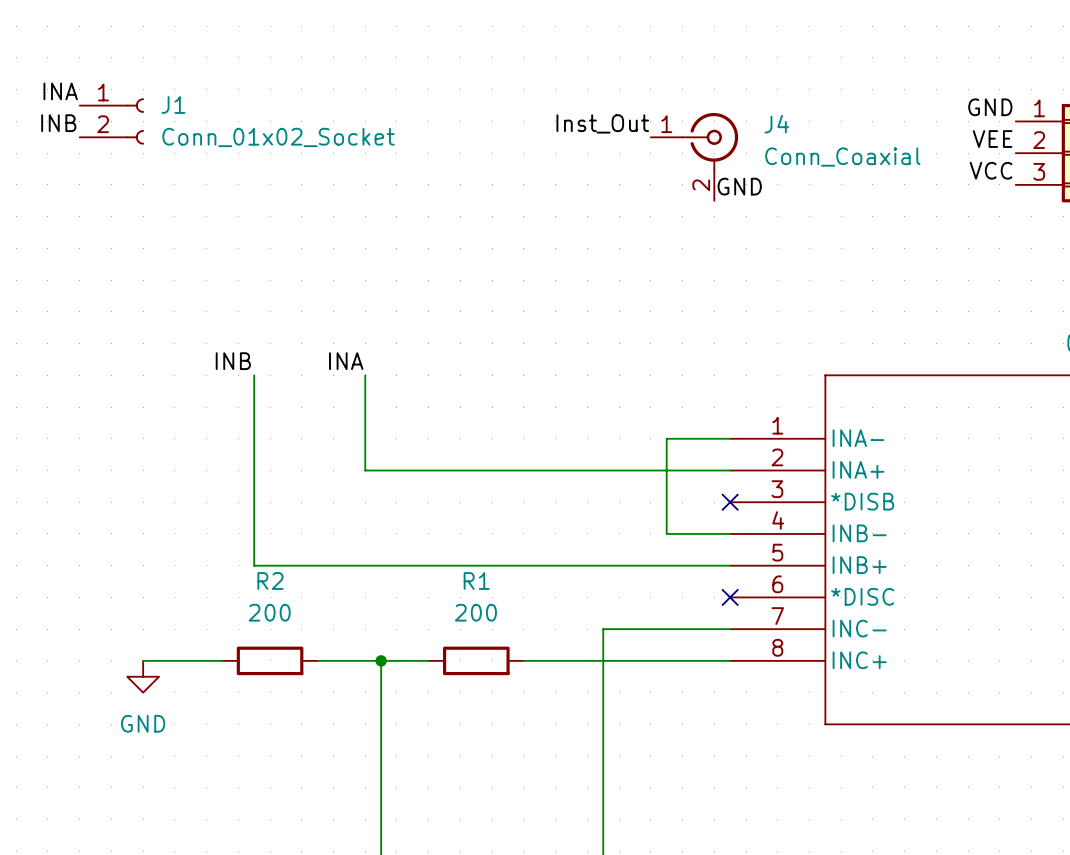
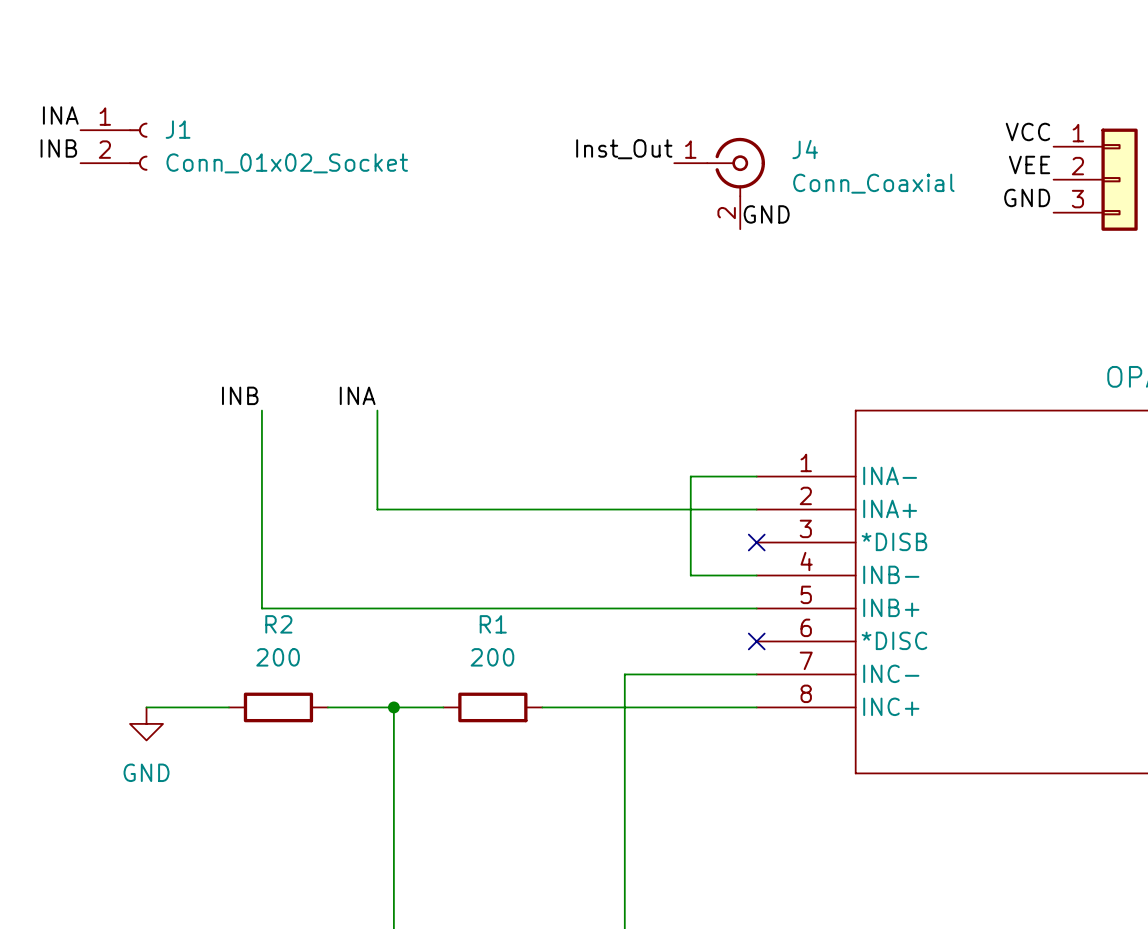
label: GND (990, 107) -> VCC (1027, 131)
label: VCC (991, 170) -> GND (1027, 197)

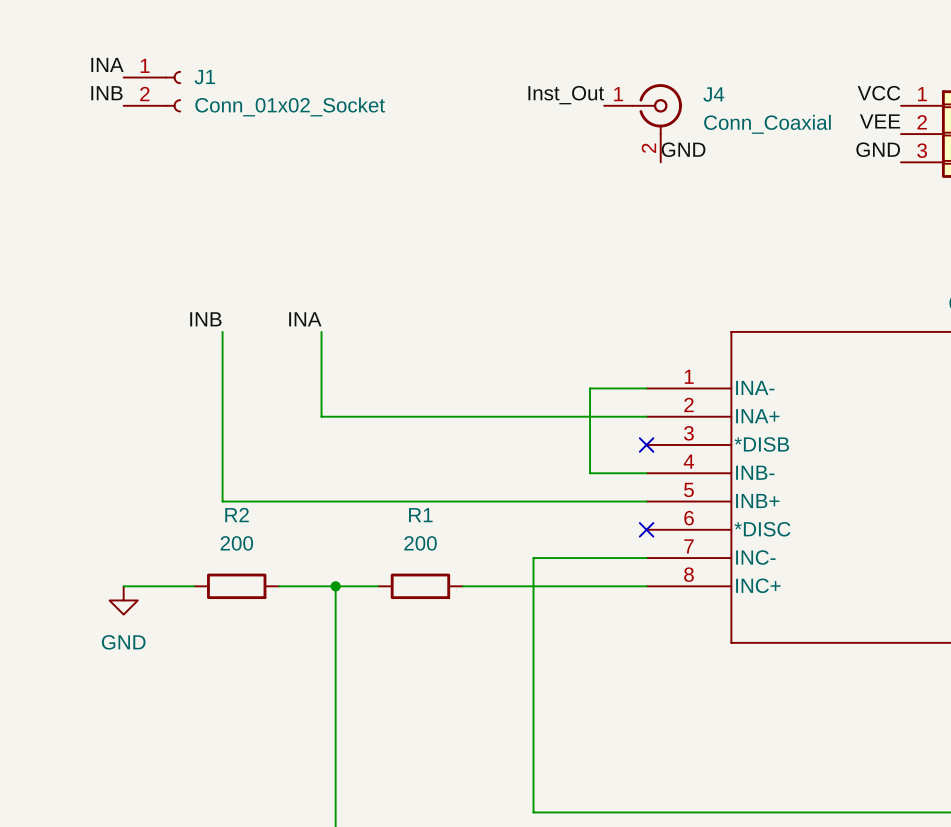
label position: INA (60, 115) -> INA (107, 64)
J1 position: (114, 146) -> (152, 91)
label position: INB (58, 148) -> INB (106, 93)
label position: Inst_Out (624, 149) -> Inst_Out (566, 95)
J4 position: (719, 183) -> (643, 123)
label position: GND (766, 214) -> GND (683, 149)

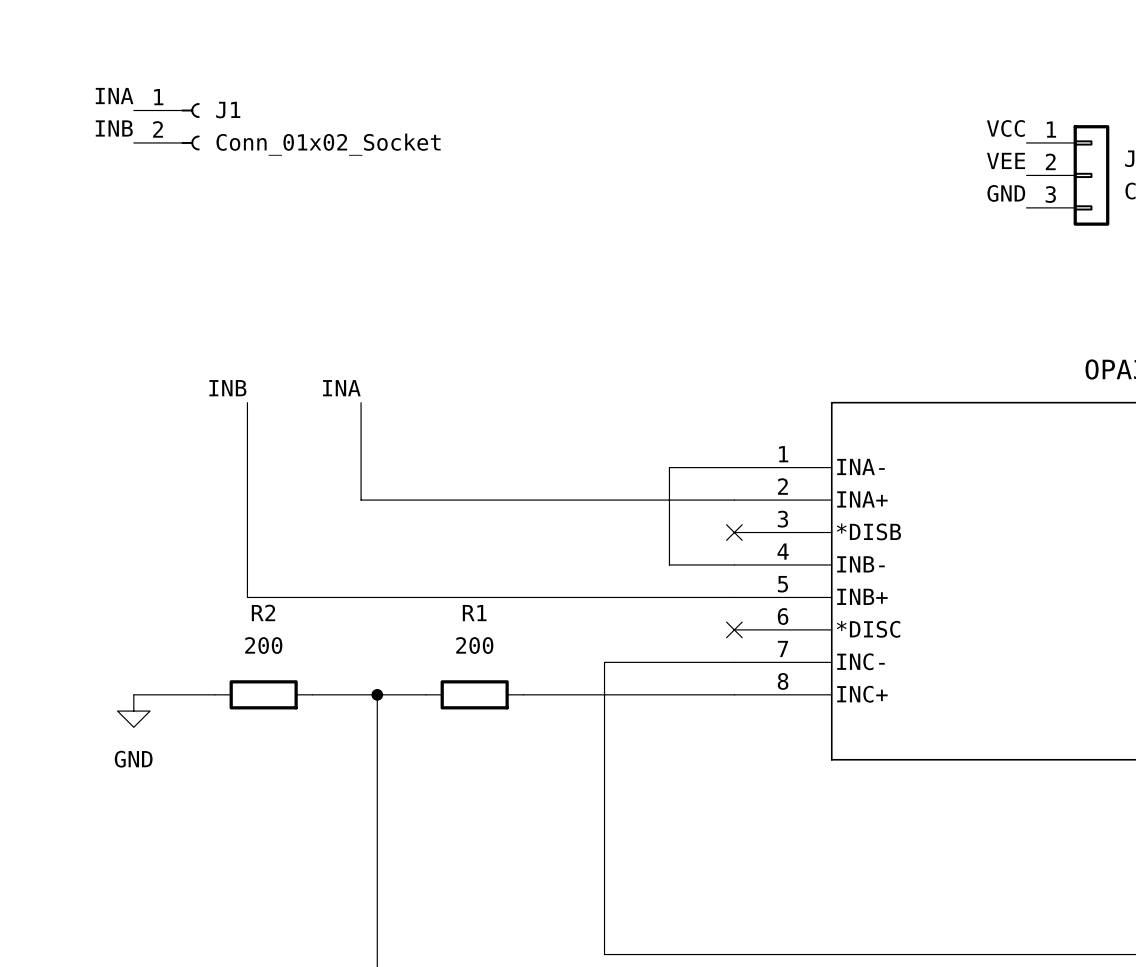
label: Inst_Out (566, 95) -> none
J4: Conn_Coaxial (643, 123) -> none
label: GND (683, 149) -> none

